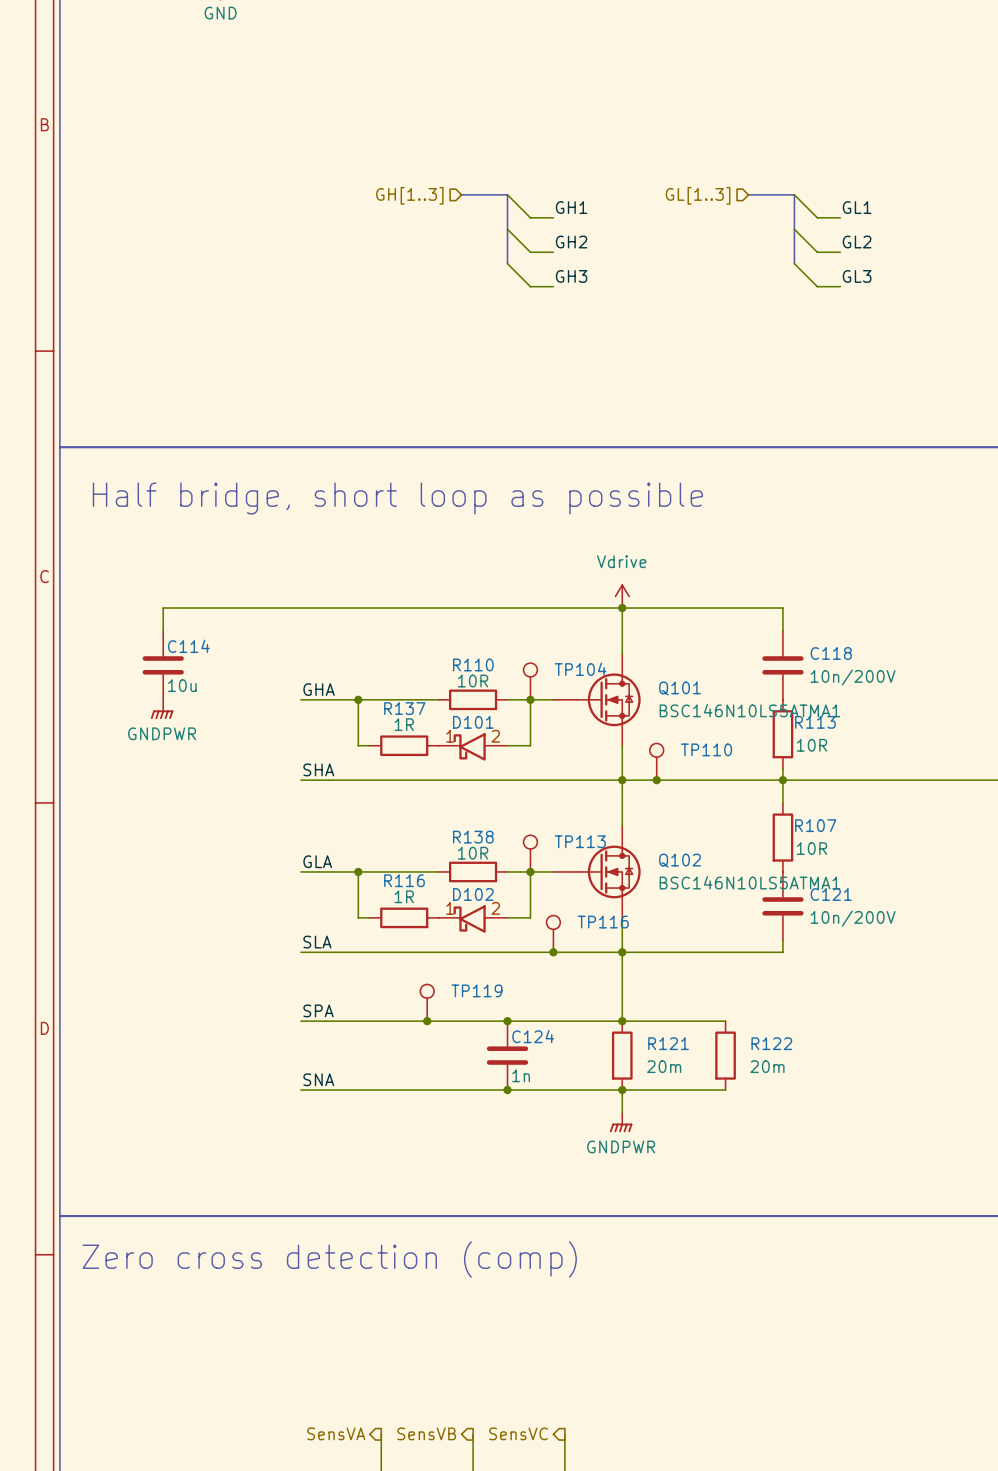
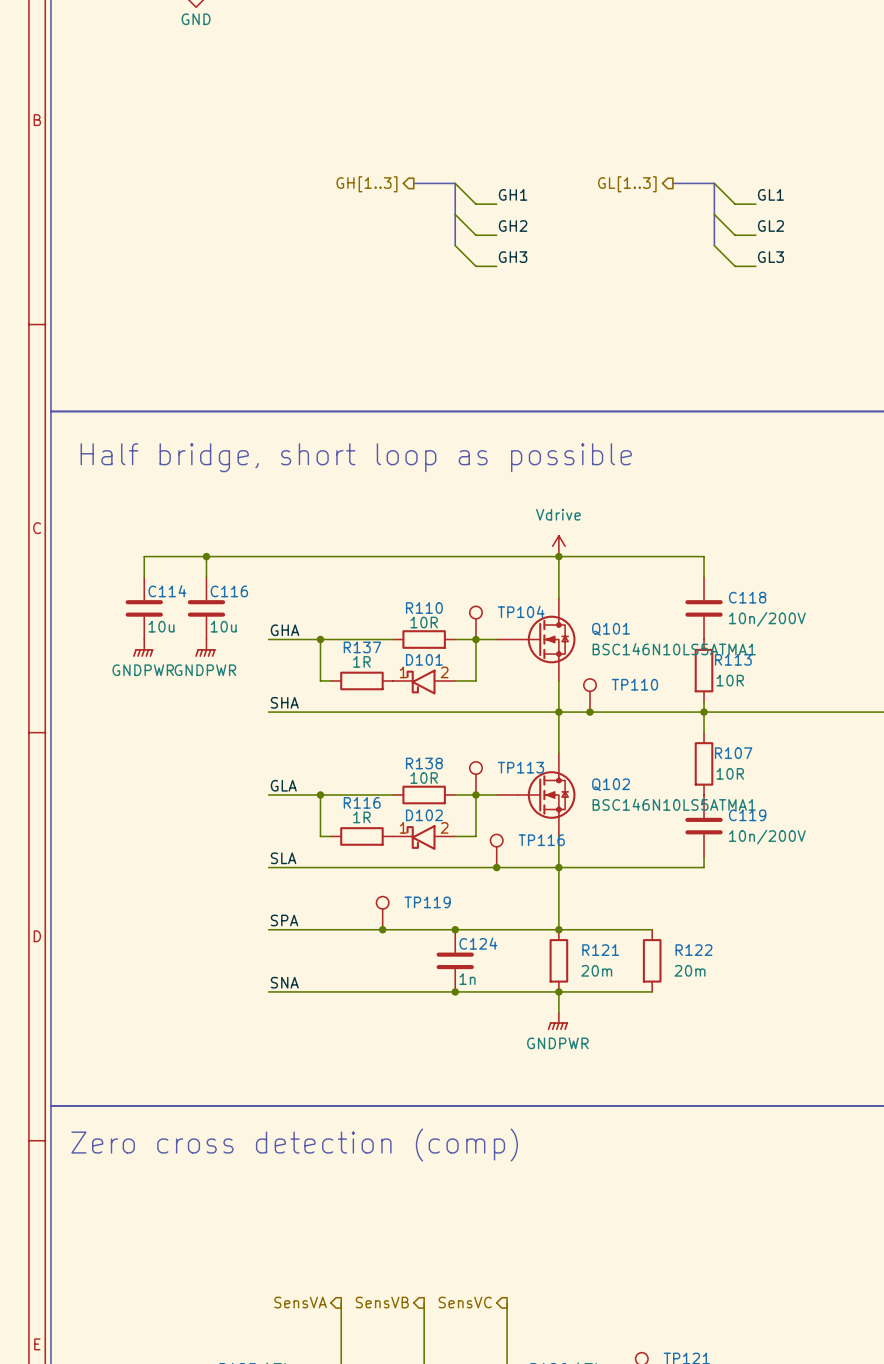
hierarchical label shape: input (409, 195) -> output (366, 184)
hierarchical label shape: input (698, 195) -> output (627, 184)
wire: none -> (206, 556) (206, 577)
junction: none -> (206, 556)
C116: none -> 10u (206, 608)
power symbol: none -> GNDPWR (205, 648)
C121 name: C121 (831, 894) -> C119 (747, 815)

